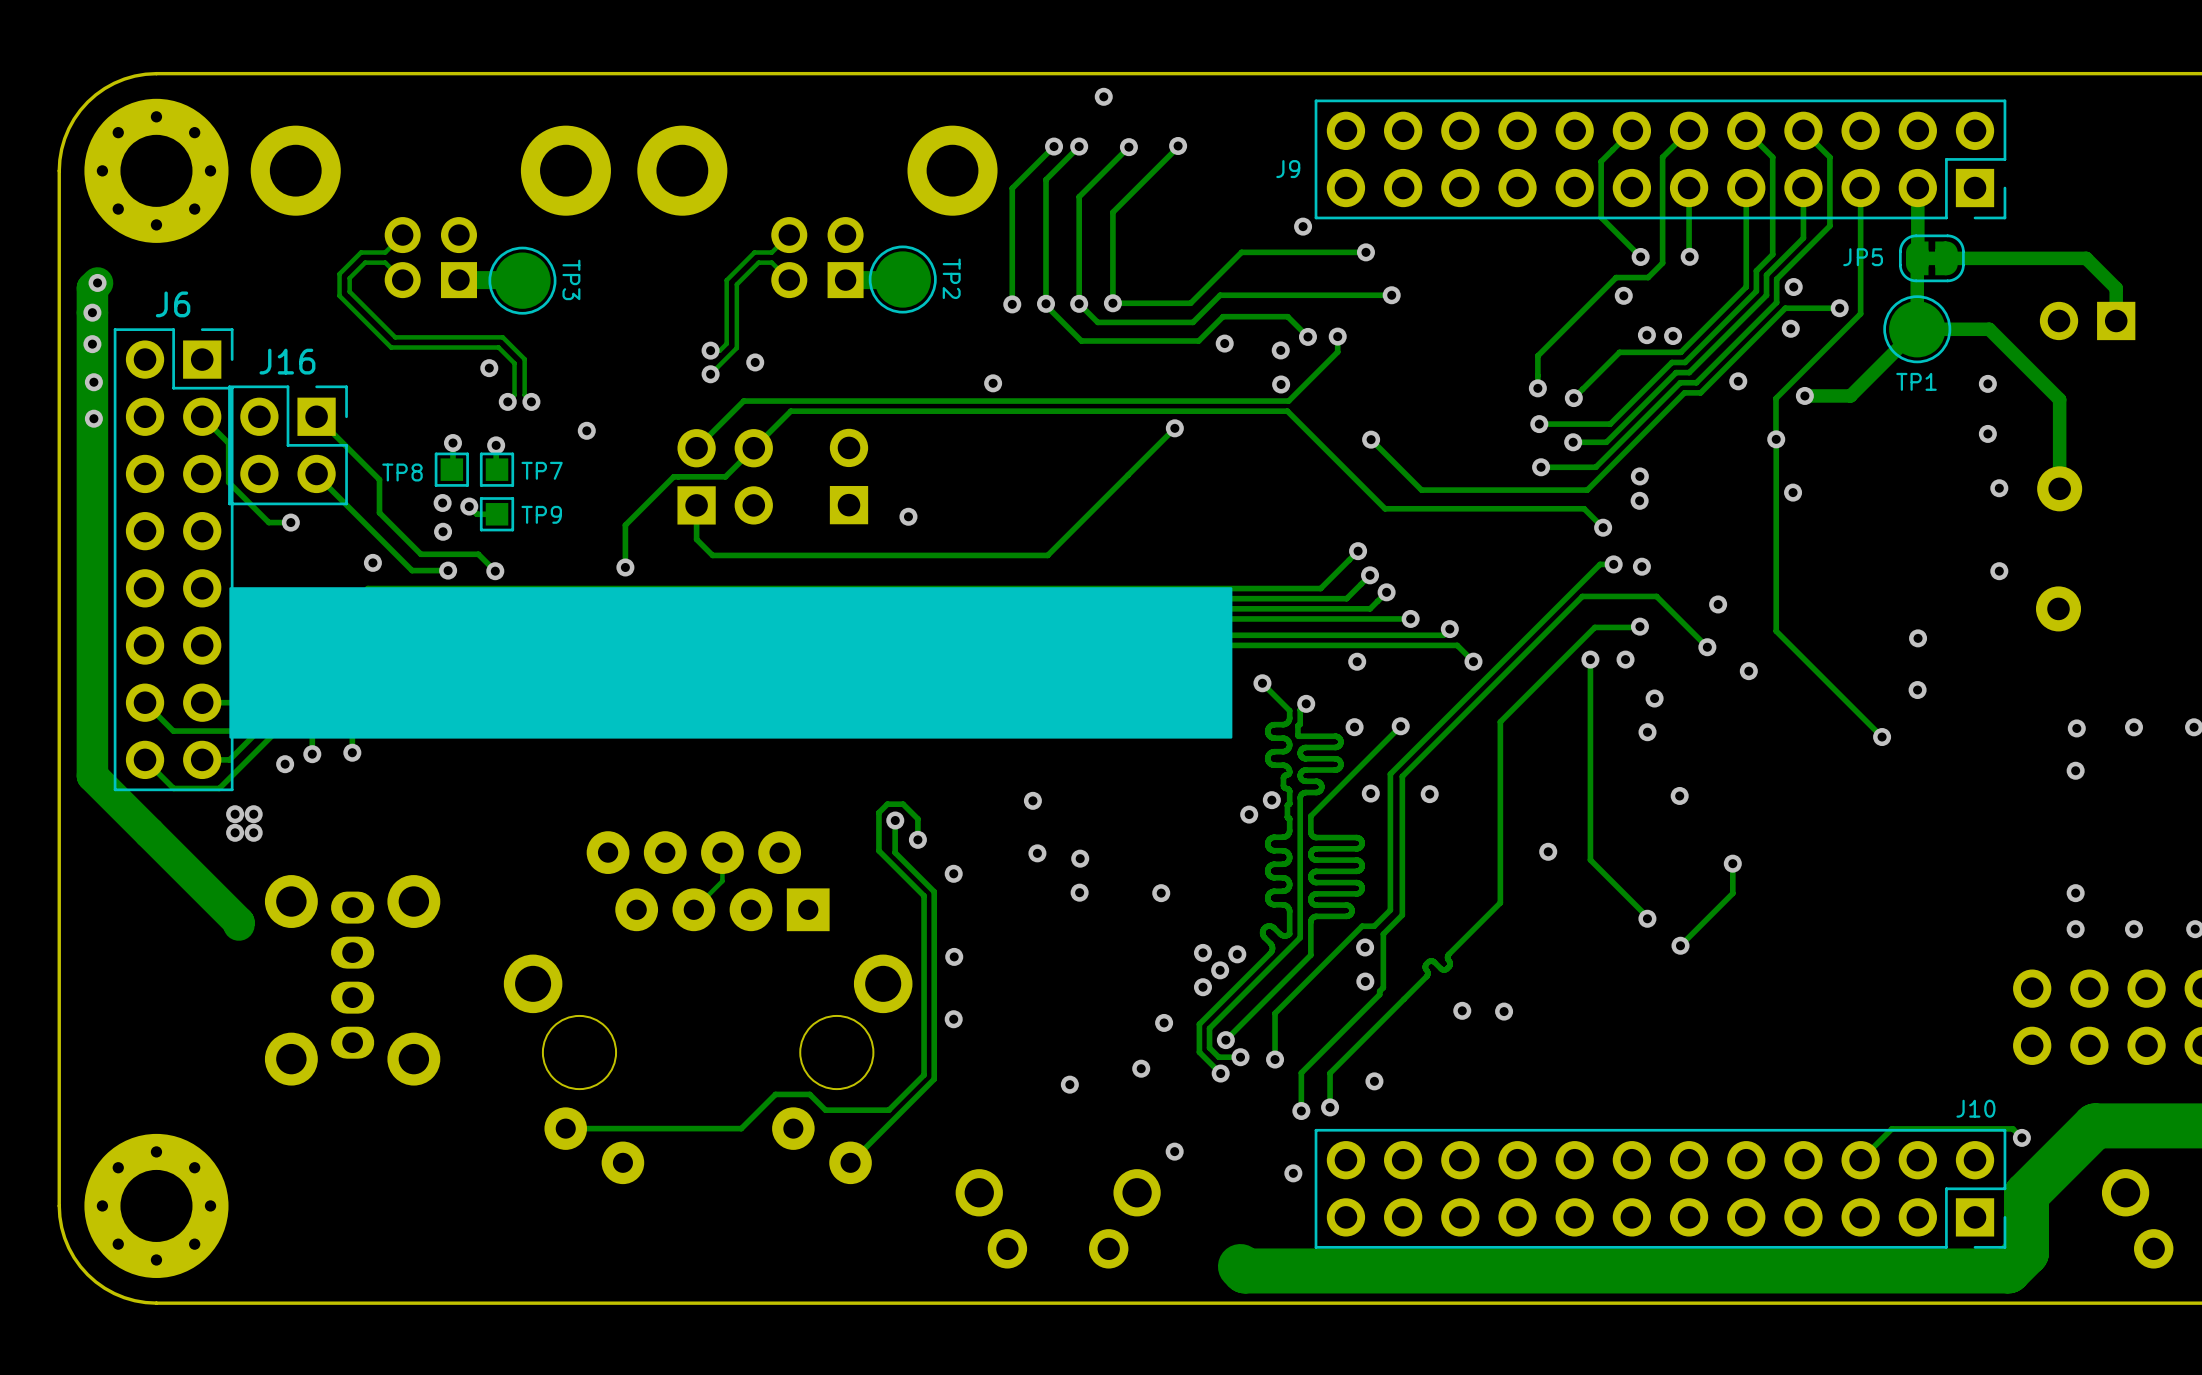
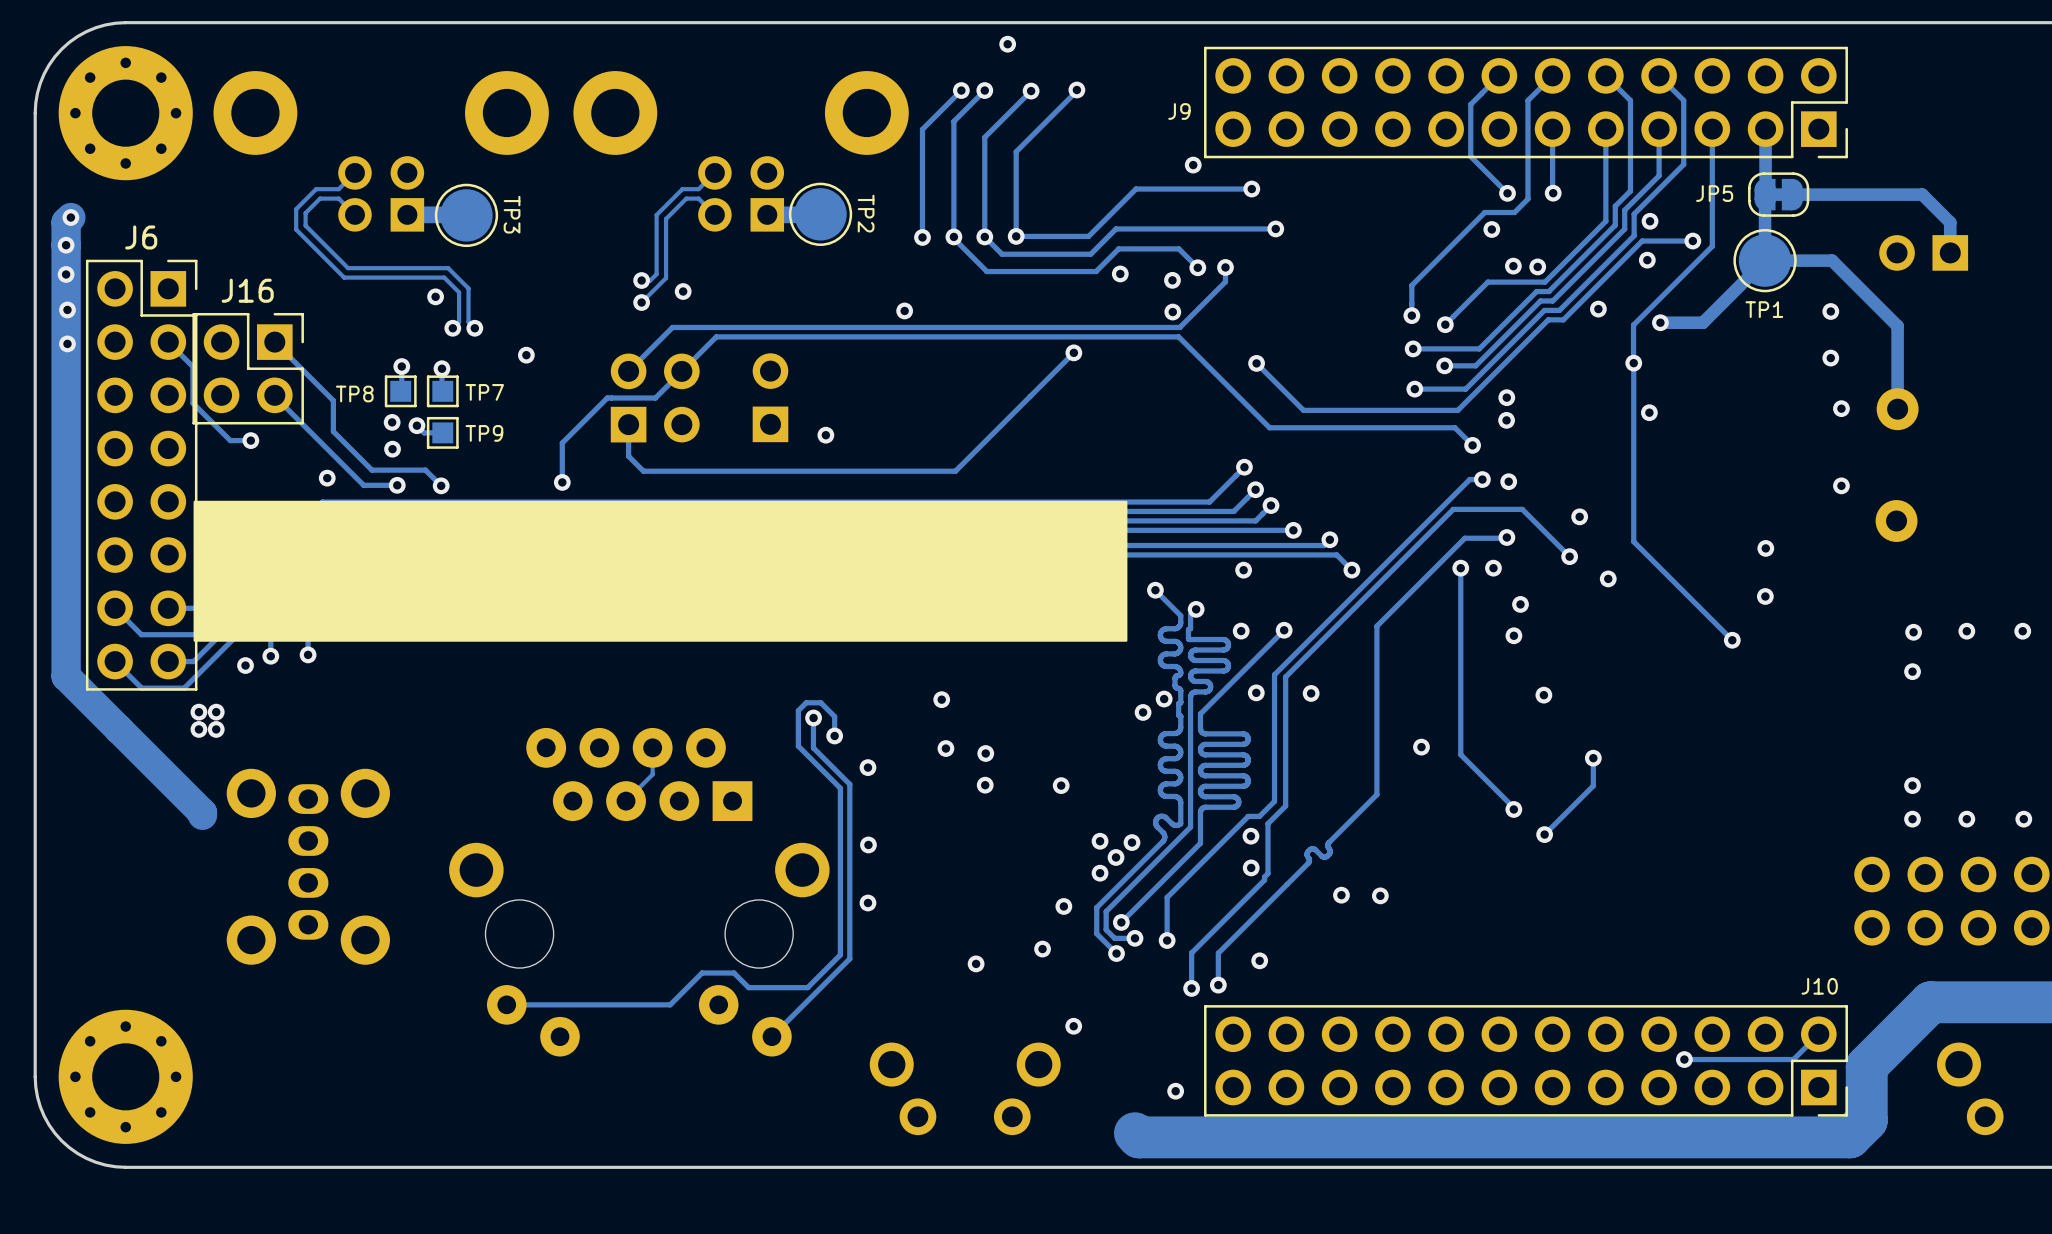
track: (2021, 1137) (2012, 1128) (1891, 1128) (1860, 1160) -> none
via: (2021, 1137) -> none
track: none -> (1818, 1034) (1793, 1059) (1684, 1059)
via position: (1293, 1173) -> (1175, 1091)
via: none -> (1684, 1059)

